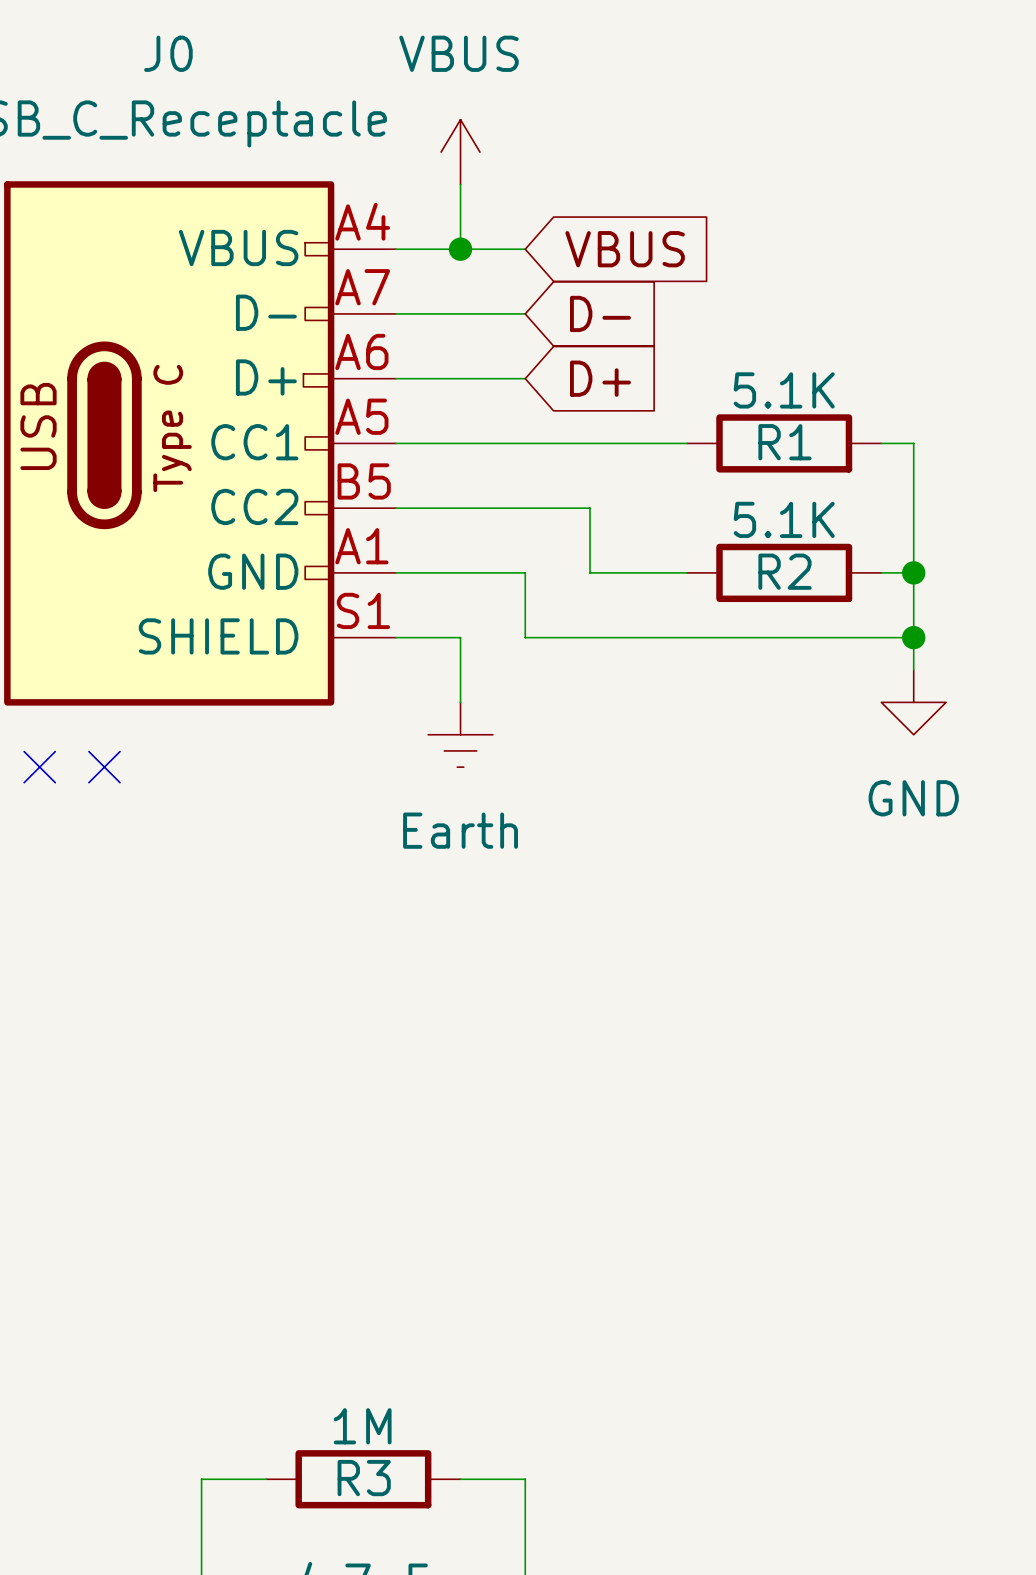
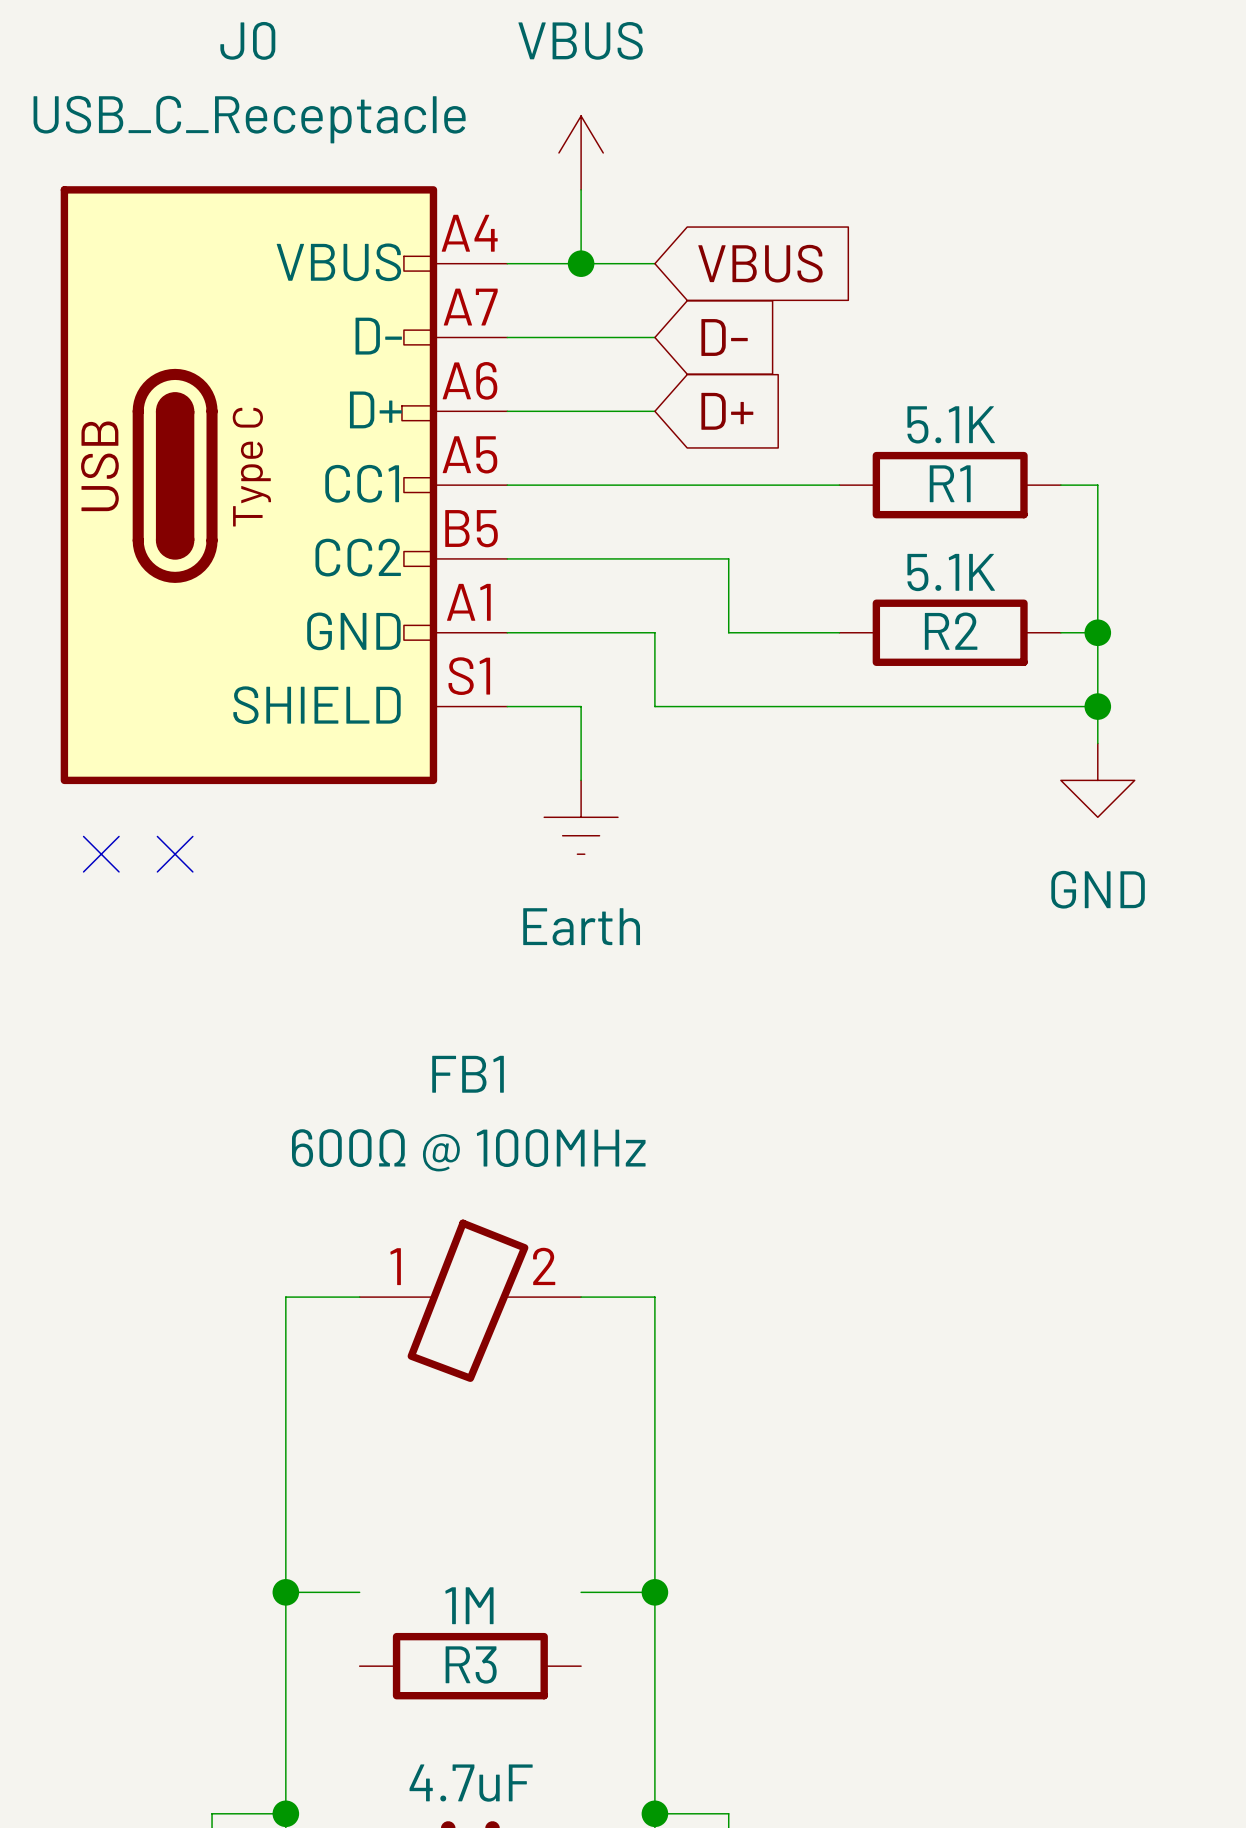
FB1: none -> 600Ω @ 100MHz (470, 1300)
wire: none -> (285, 1592) (359, 1592)
junction: none -> (285, 1592)
wire: none -> (581, 1592) (654, 1592)
junction: none -> (654, 1592)
wire: (201, 1479) (266, 1479) -> (285, 1666) (285, 1297) (359, 1297)
wire: (460, 1479) (525, 1479) -> (581, 1297) (654, 1297) (654, 1666)

